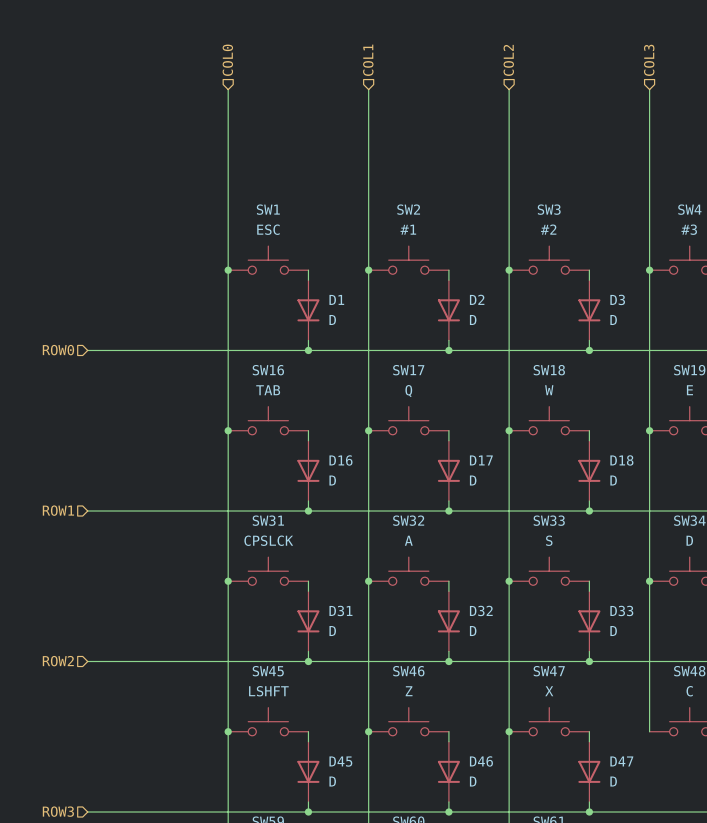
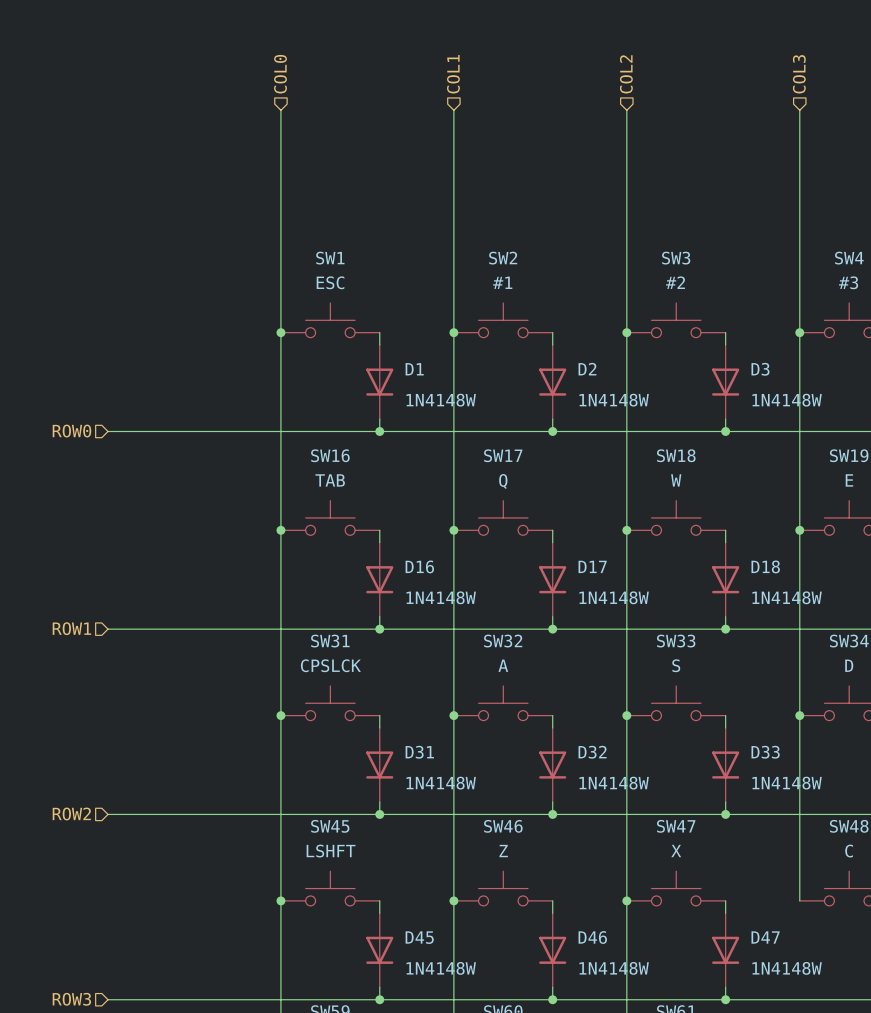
D1 value: D (332, 319) -> 1N4148W (441, 400)
D2 value: D (473, 319) -> 1N4148W (614, 400)
D3 value: D (613, 319) -> 1N4148W (787, 400)
D16 value: D (332, 480) -> 1N4148W (441, 597)
D17 value: D (473, 480) -> 1N4148W (614, 597)
D18 value: D (613, 480) -> 1N4148W (787, 597)
D31 value: D (332, 631) -> 1N4148W (441, 783)
D32 value: D (473, 631) -> 1N4148W (614, 783)
D33 value: D (613, 631) -> 1N4148W (787, 783)
D45 value: D (332, 781) -> 1N4148W (441, 968)
D46 value: D (473, 781) -> 1N4148W (614, 968)
D47 value: D (613, 781) -> 1N4148W (787, 968)

